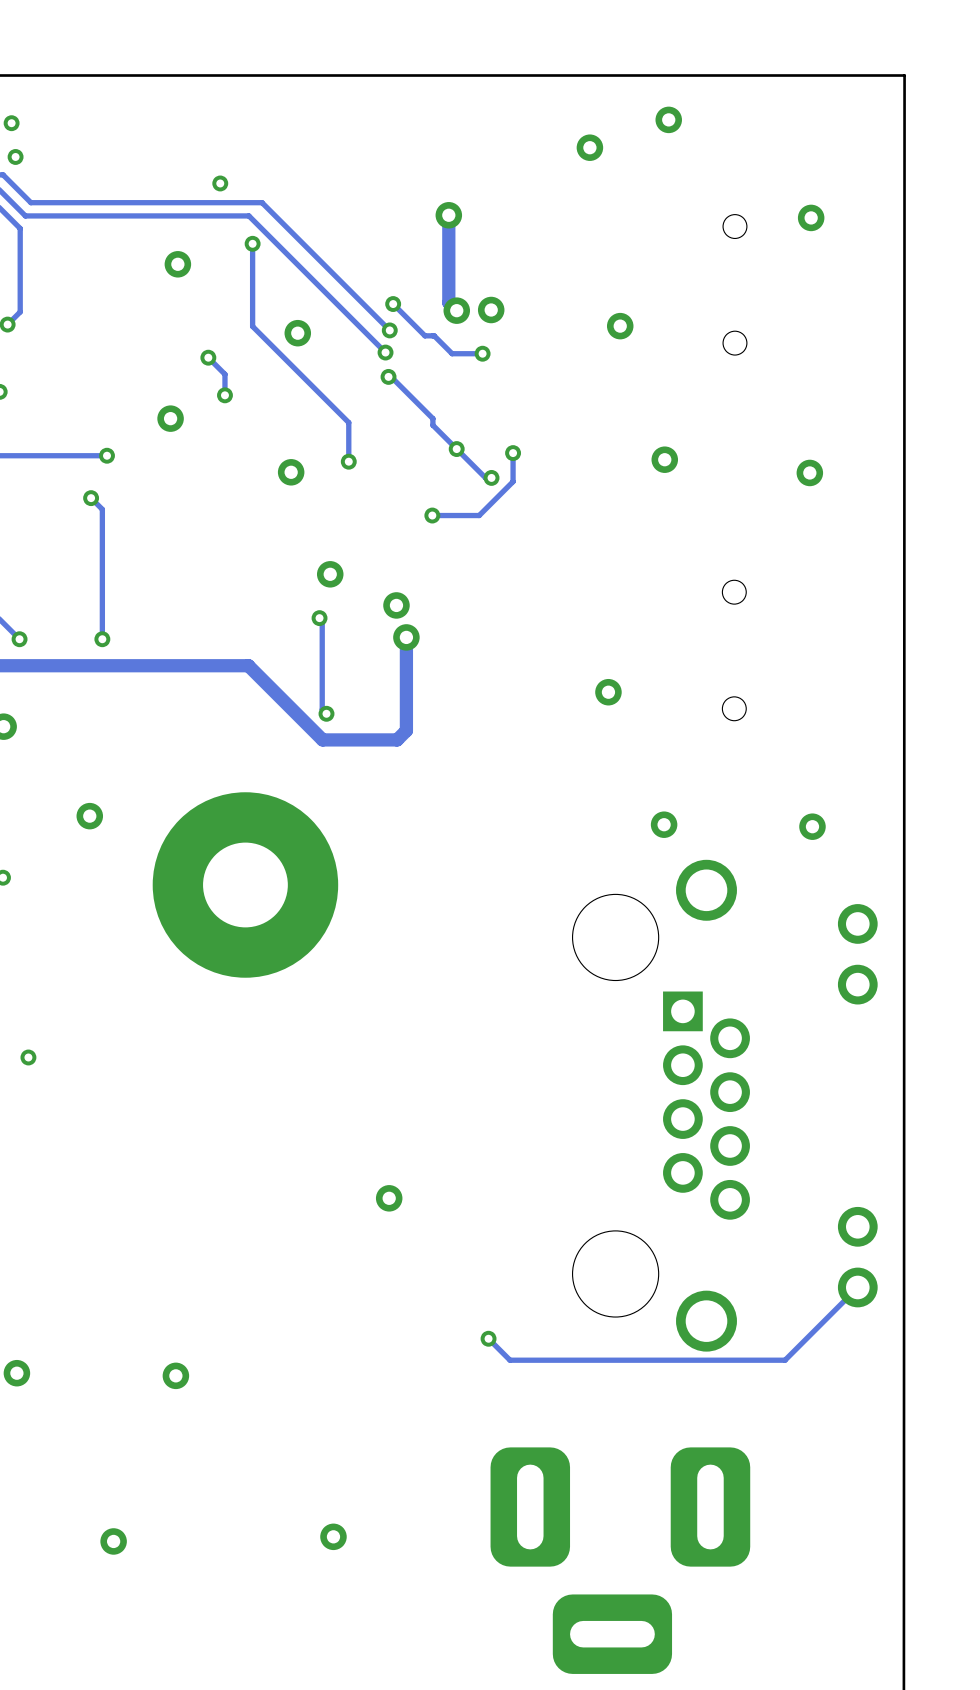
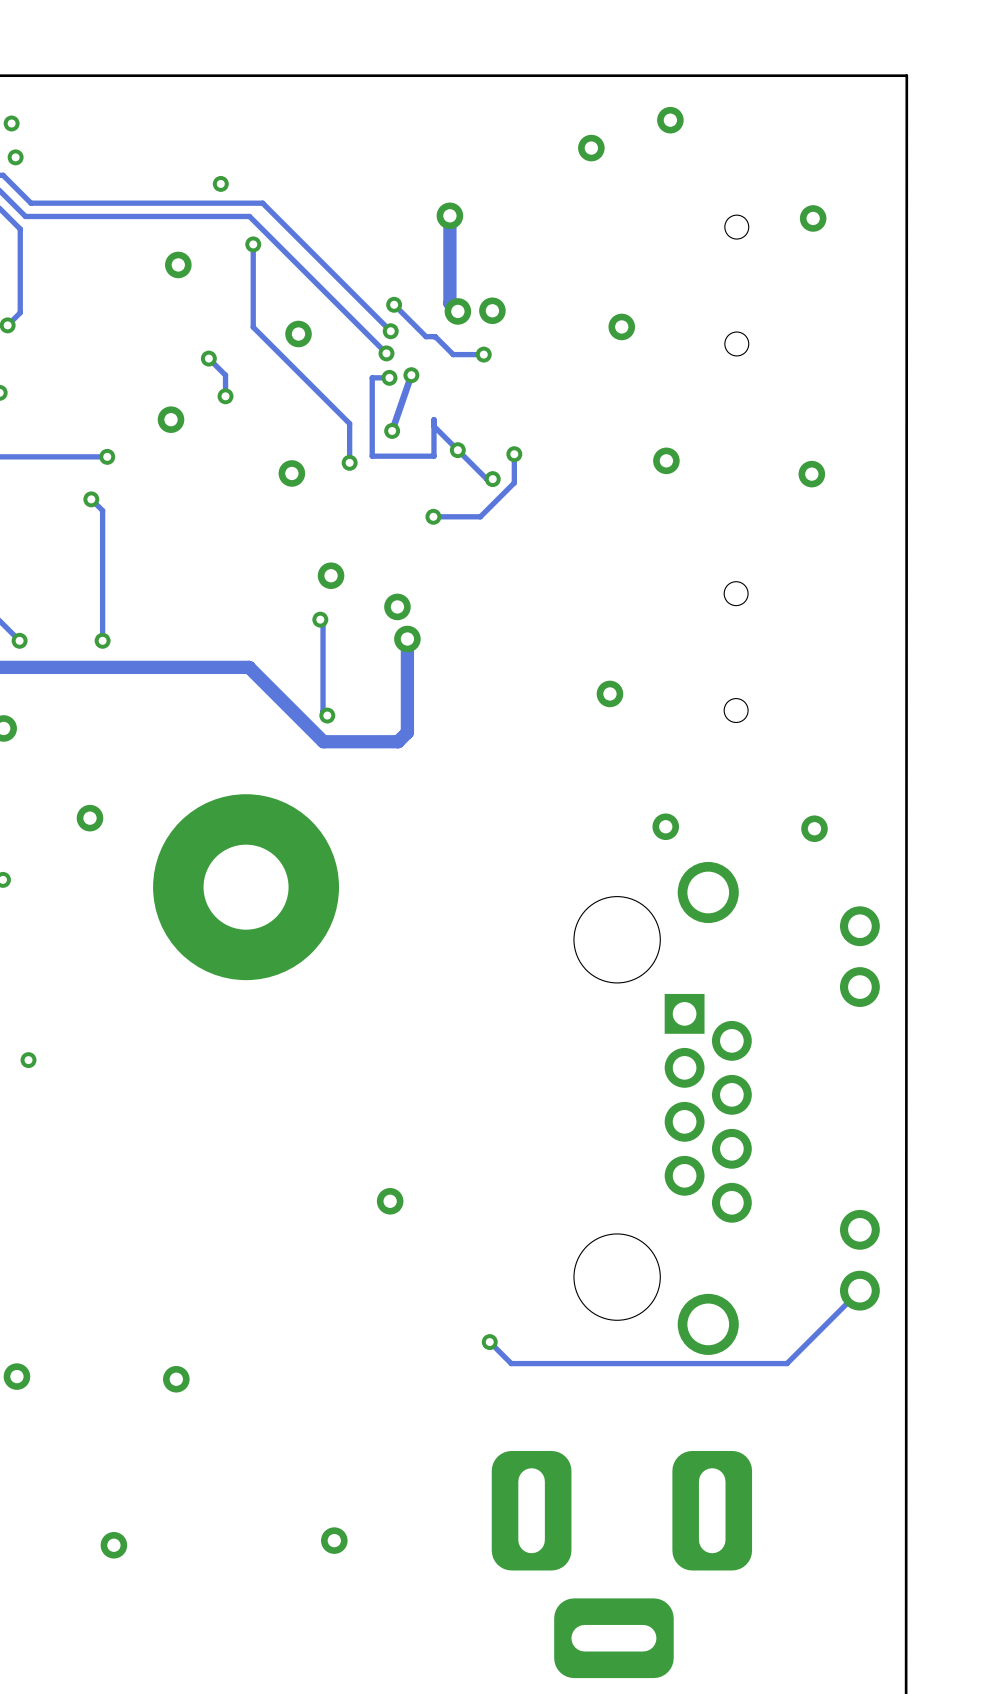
track: none -> (411, 375) (392, 430)
via: none -> (411, 375)
track: (388, 376) (391, 376) (432, 418) -> (389, 377) (372, 377) (372, 456) (433, 456) (433, 426)
via: none -> (392, 430)

